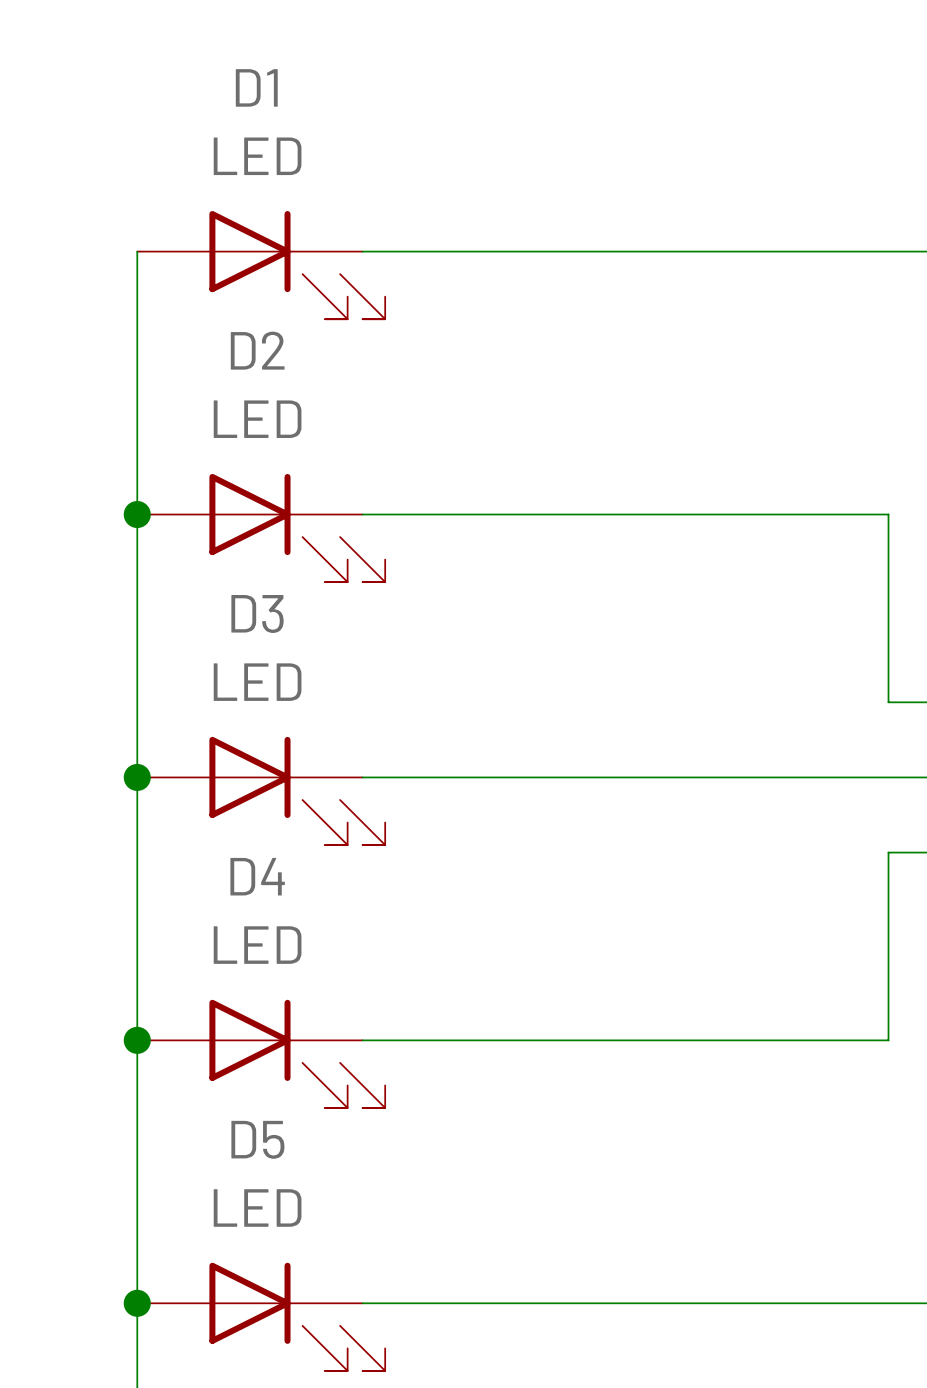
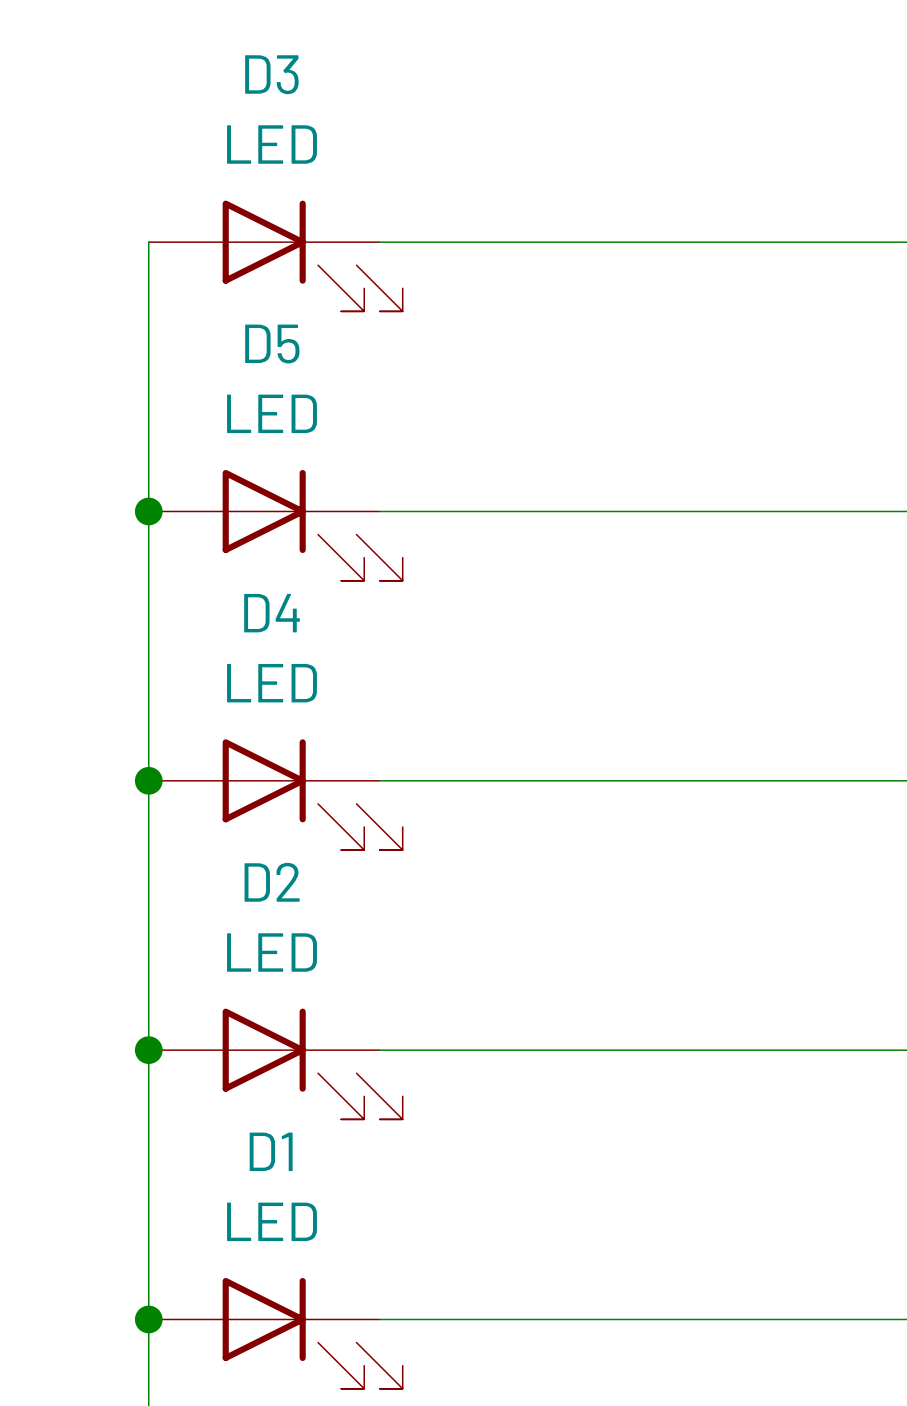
D1 name: D1 (256, 87) -> D3 (271, 74)
D2 name: D2 (257, 350) -> D5 (272, 344)
D3 name: D3 (257, 613) -> D4 (272, 613)
D4 name: D4 (257, 876) -> D2 (272, 882)
D5 name: D5 (257, 1139) -> D1 (271, 1151)

